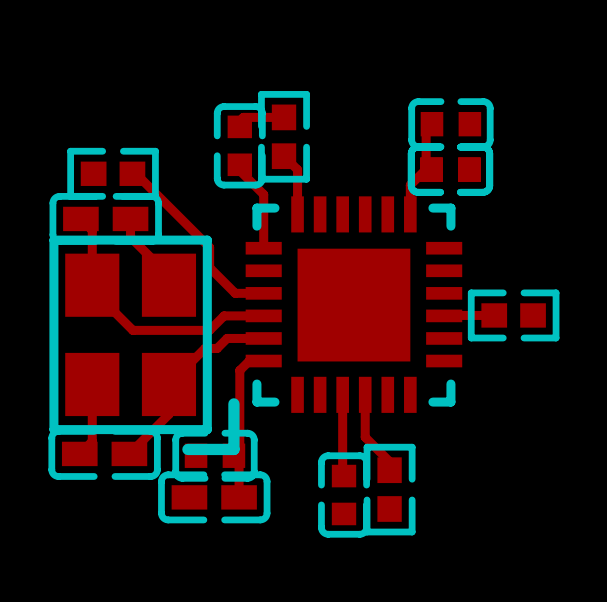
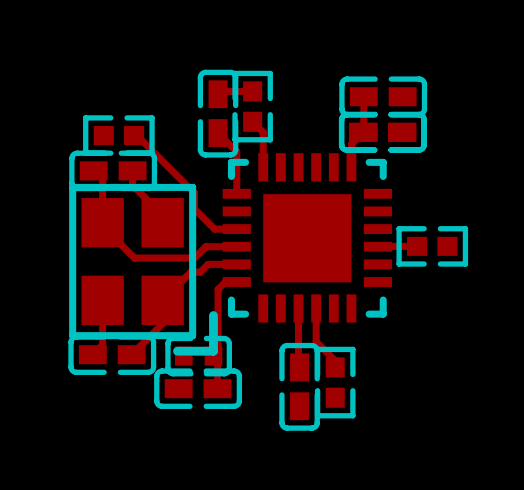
part footprint: [408, 98, 494, 151] -> [339, 76, 428, 118]
part footprint: [213, 103, 266, 189] -> [197, 69, 239, 158]
part footprint: [407, 143, 494, 196] -> [338, 112, 427, 153]
part footprint: [318, 452, 370, 538] -> [279, 342, 320, 431]

